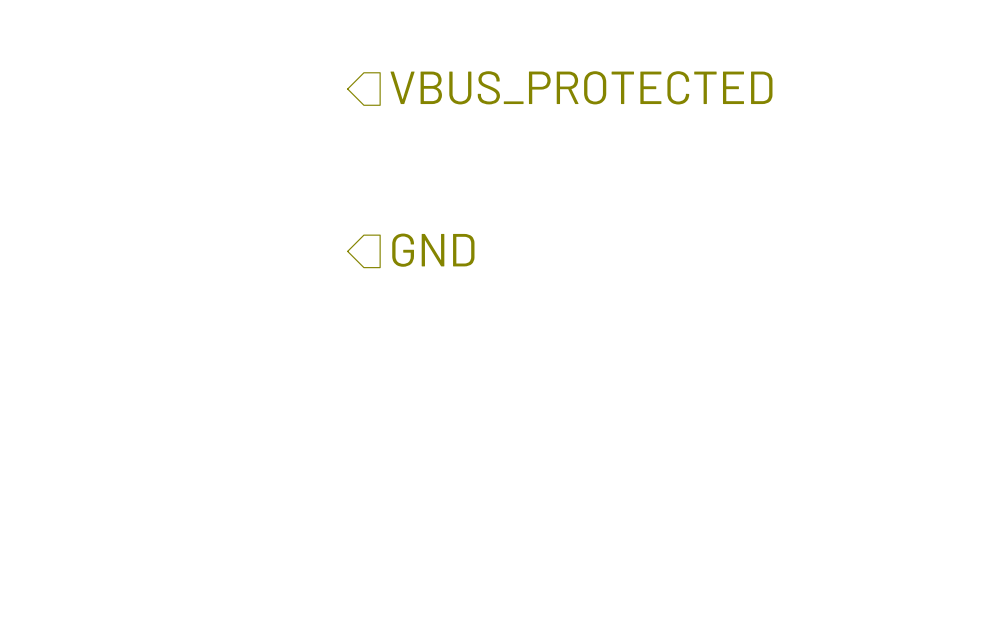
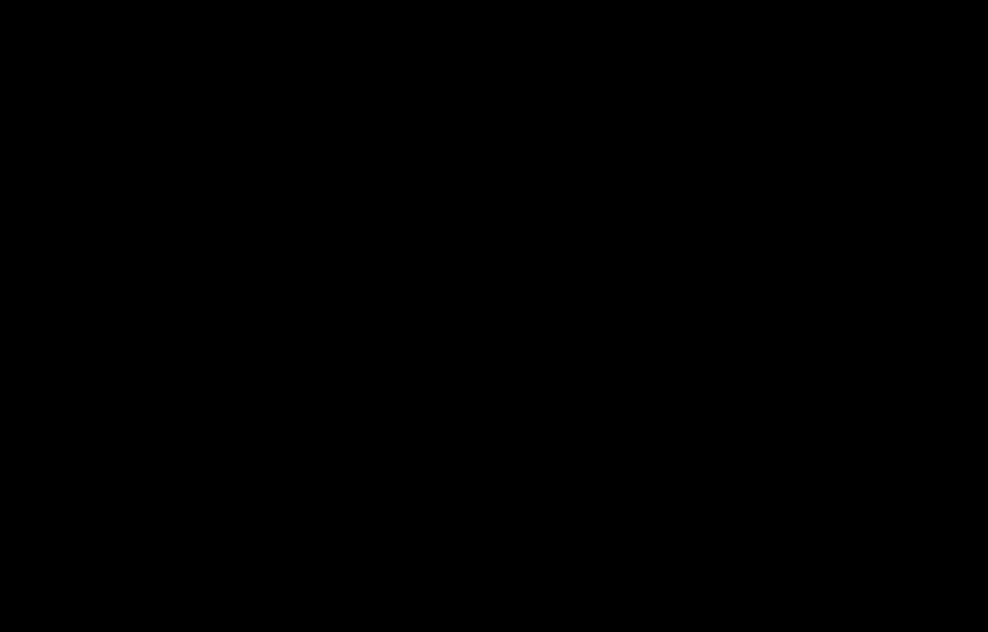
hierarchical label: VBUS_PROTECTED (581, 87) -> none
hierarchical label: GND (433, 250) -> none

